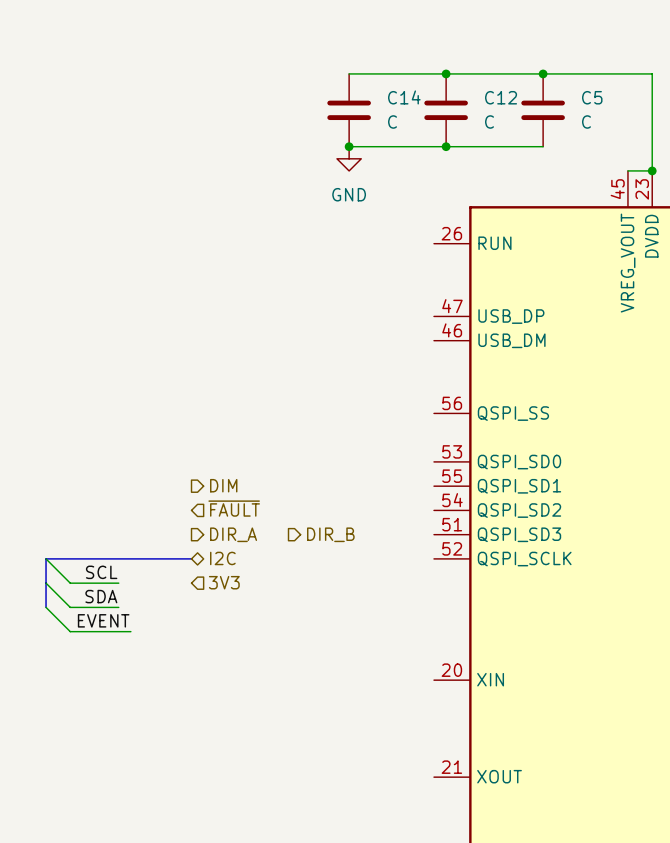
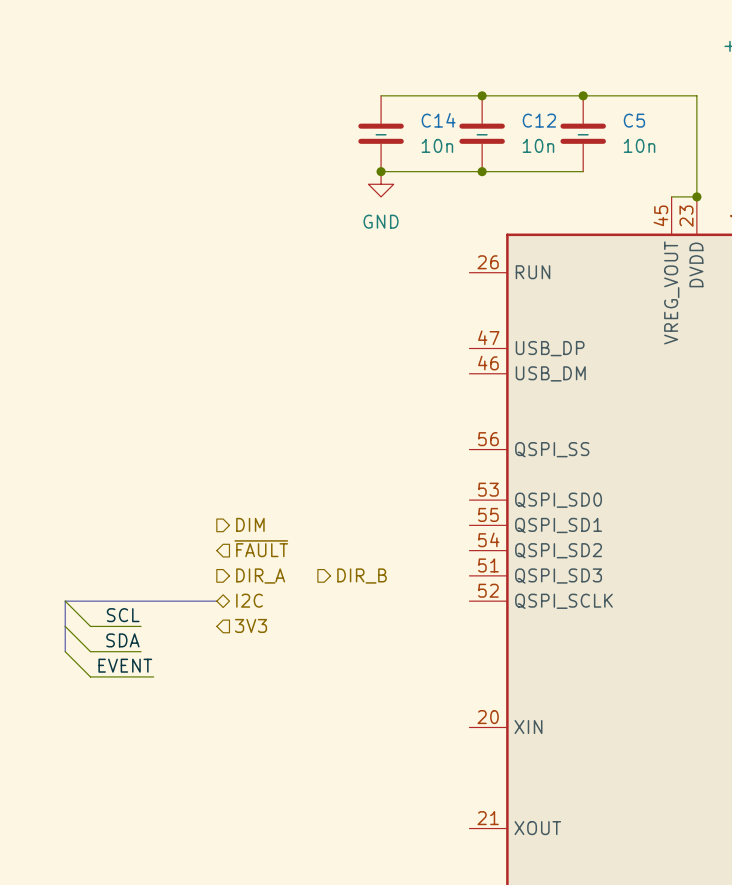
C14 text: none -> - (381, 134)
C12 text: none -> - (482, 134)
C5 text: none -> - (583, 134)
C14 value: C (392, 121) -> 10n (437, 145)
C12 value: C (489, 121) -> 10n (538, 145)
C5 value: C (586, 121) -> 10n (639, 145)

